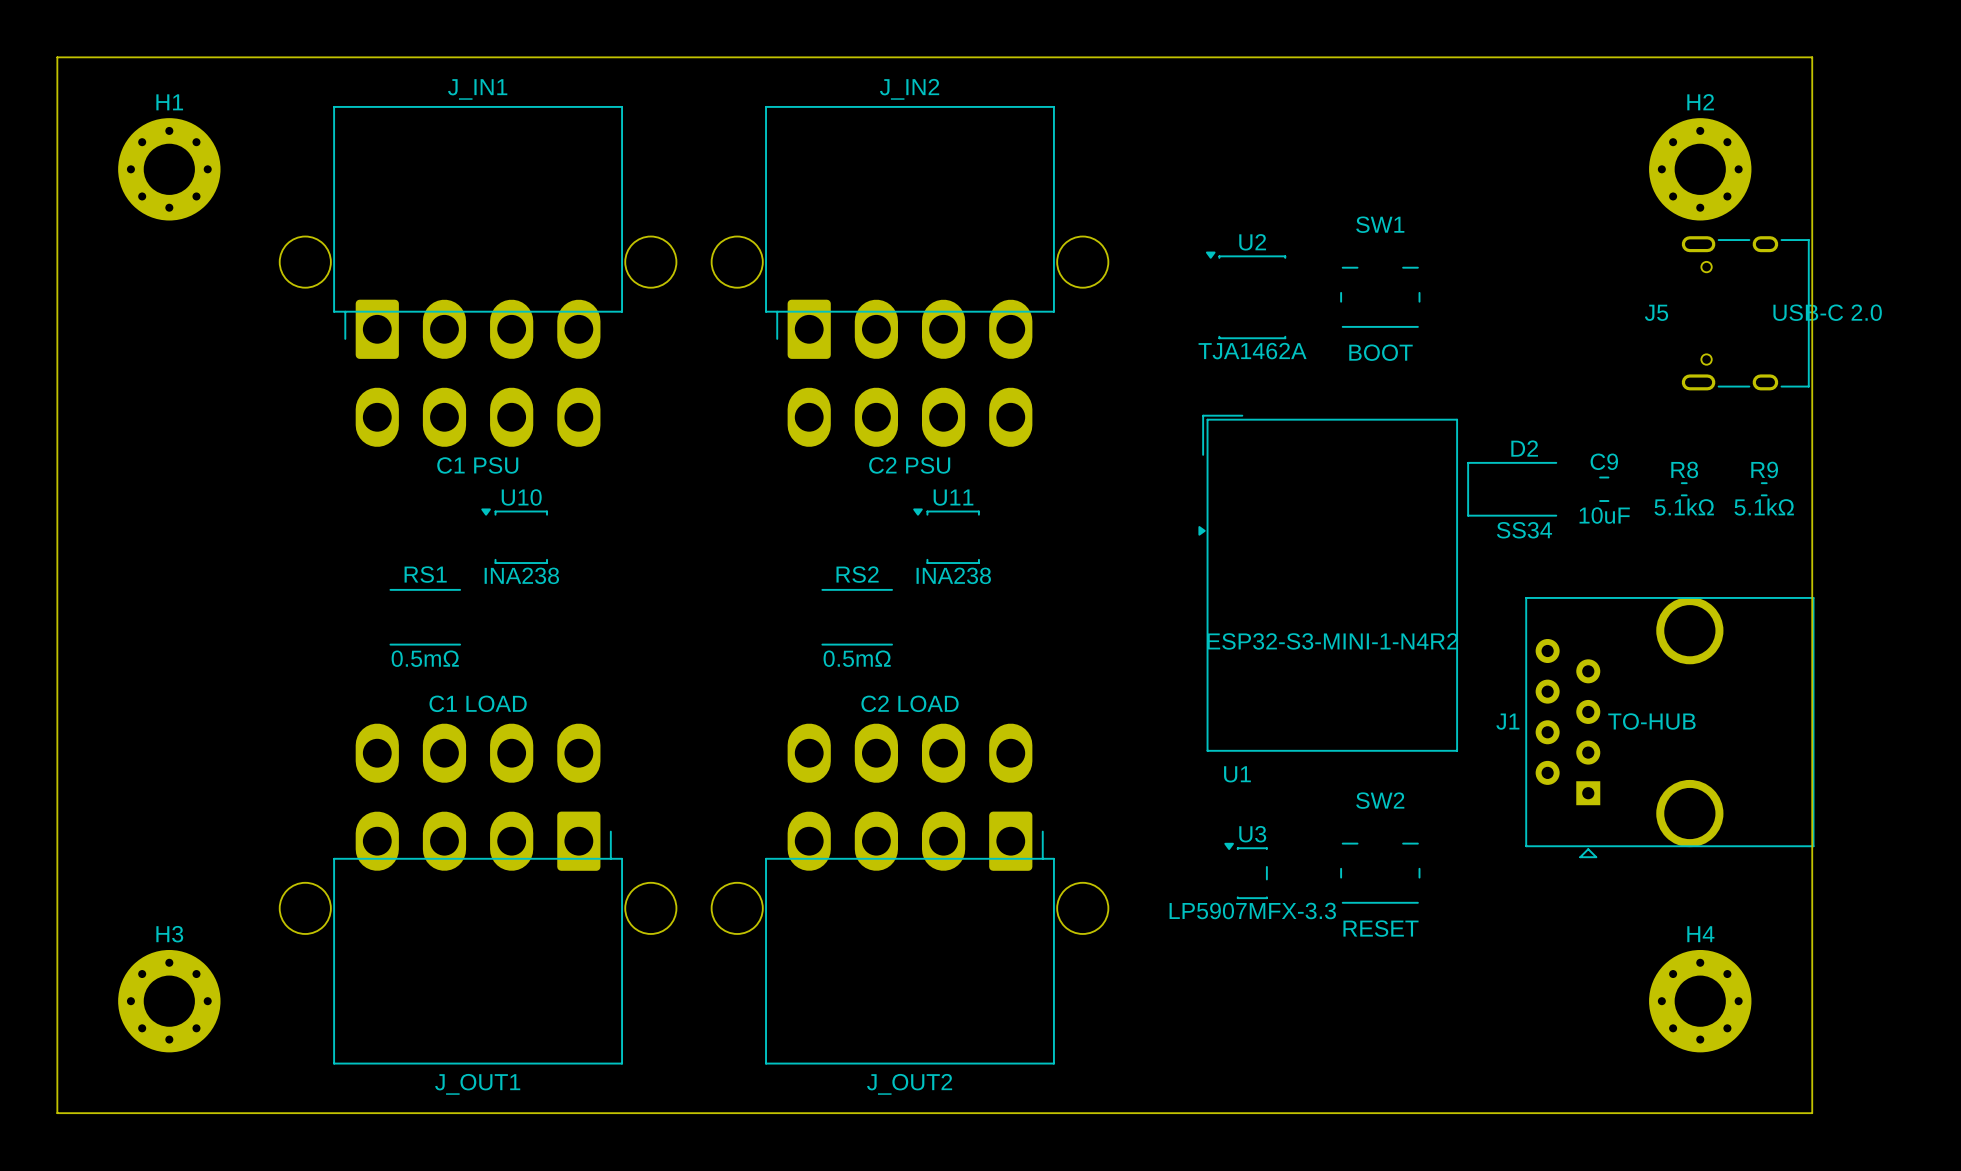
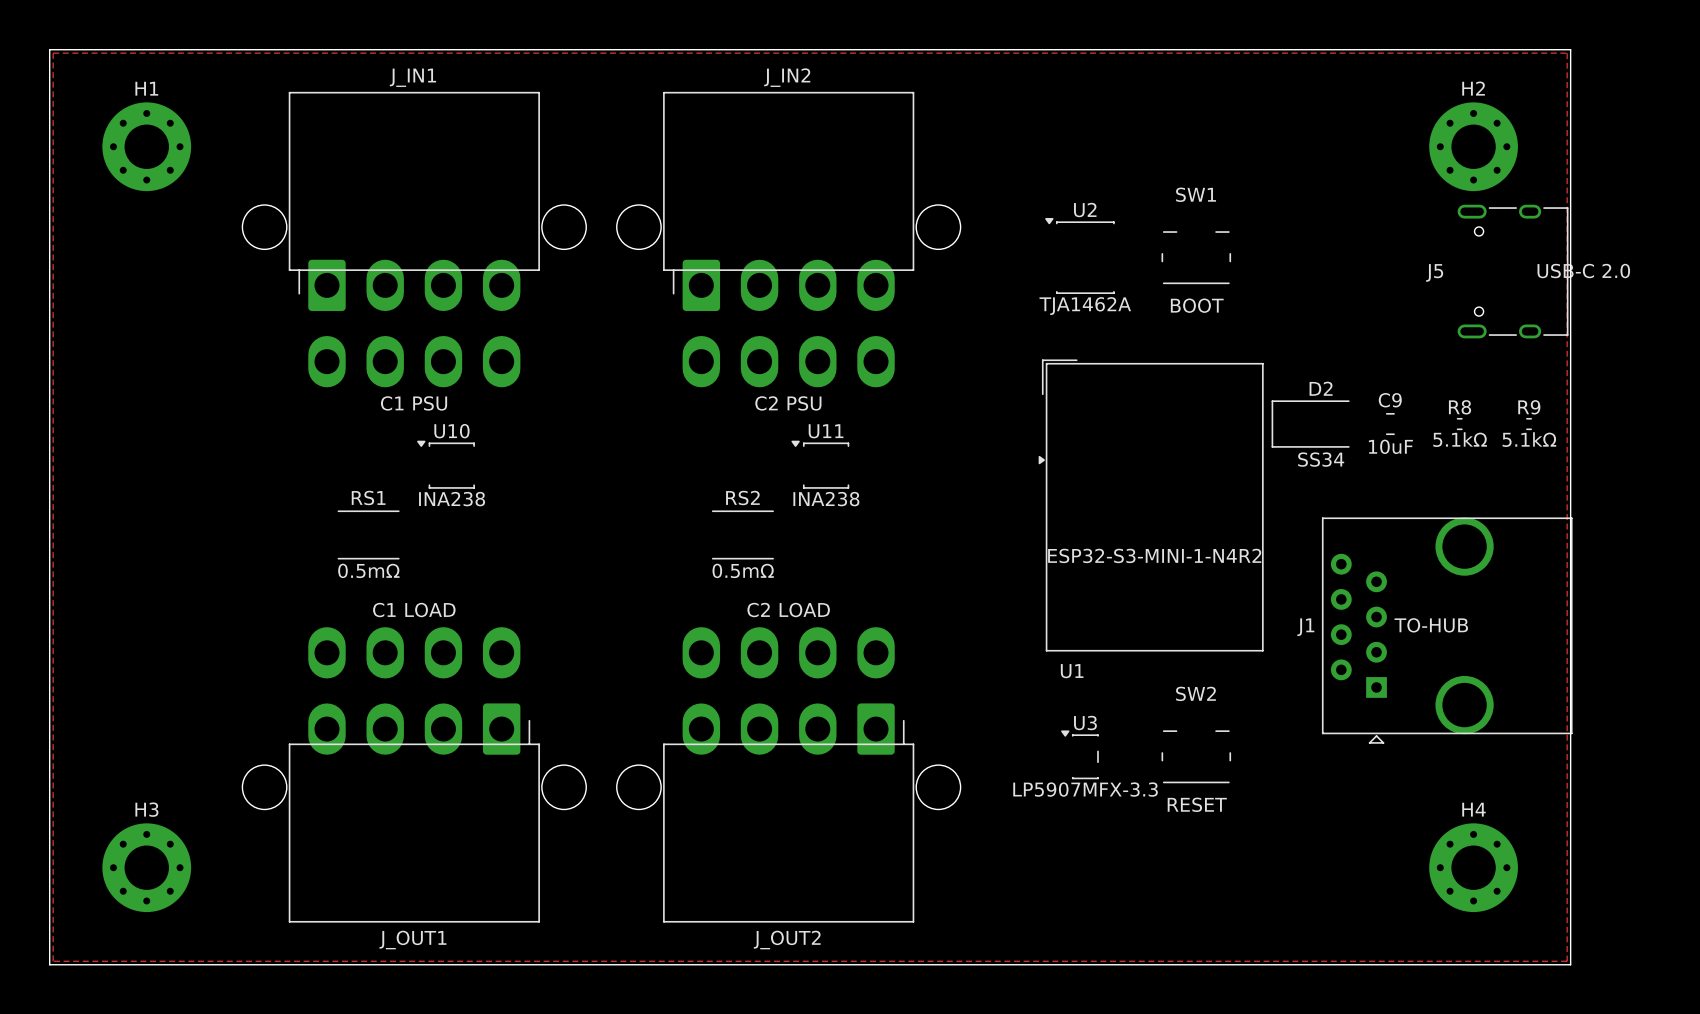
zone outline: none -> (53, 53) (1567, 53) (1567, 961) (53, 961) (53, 53)

